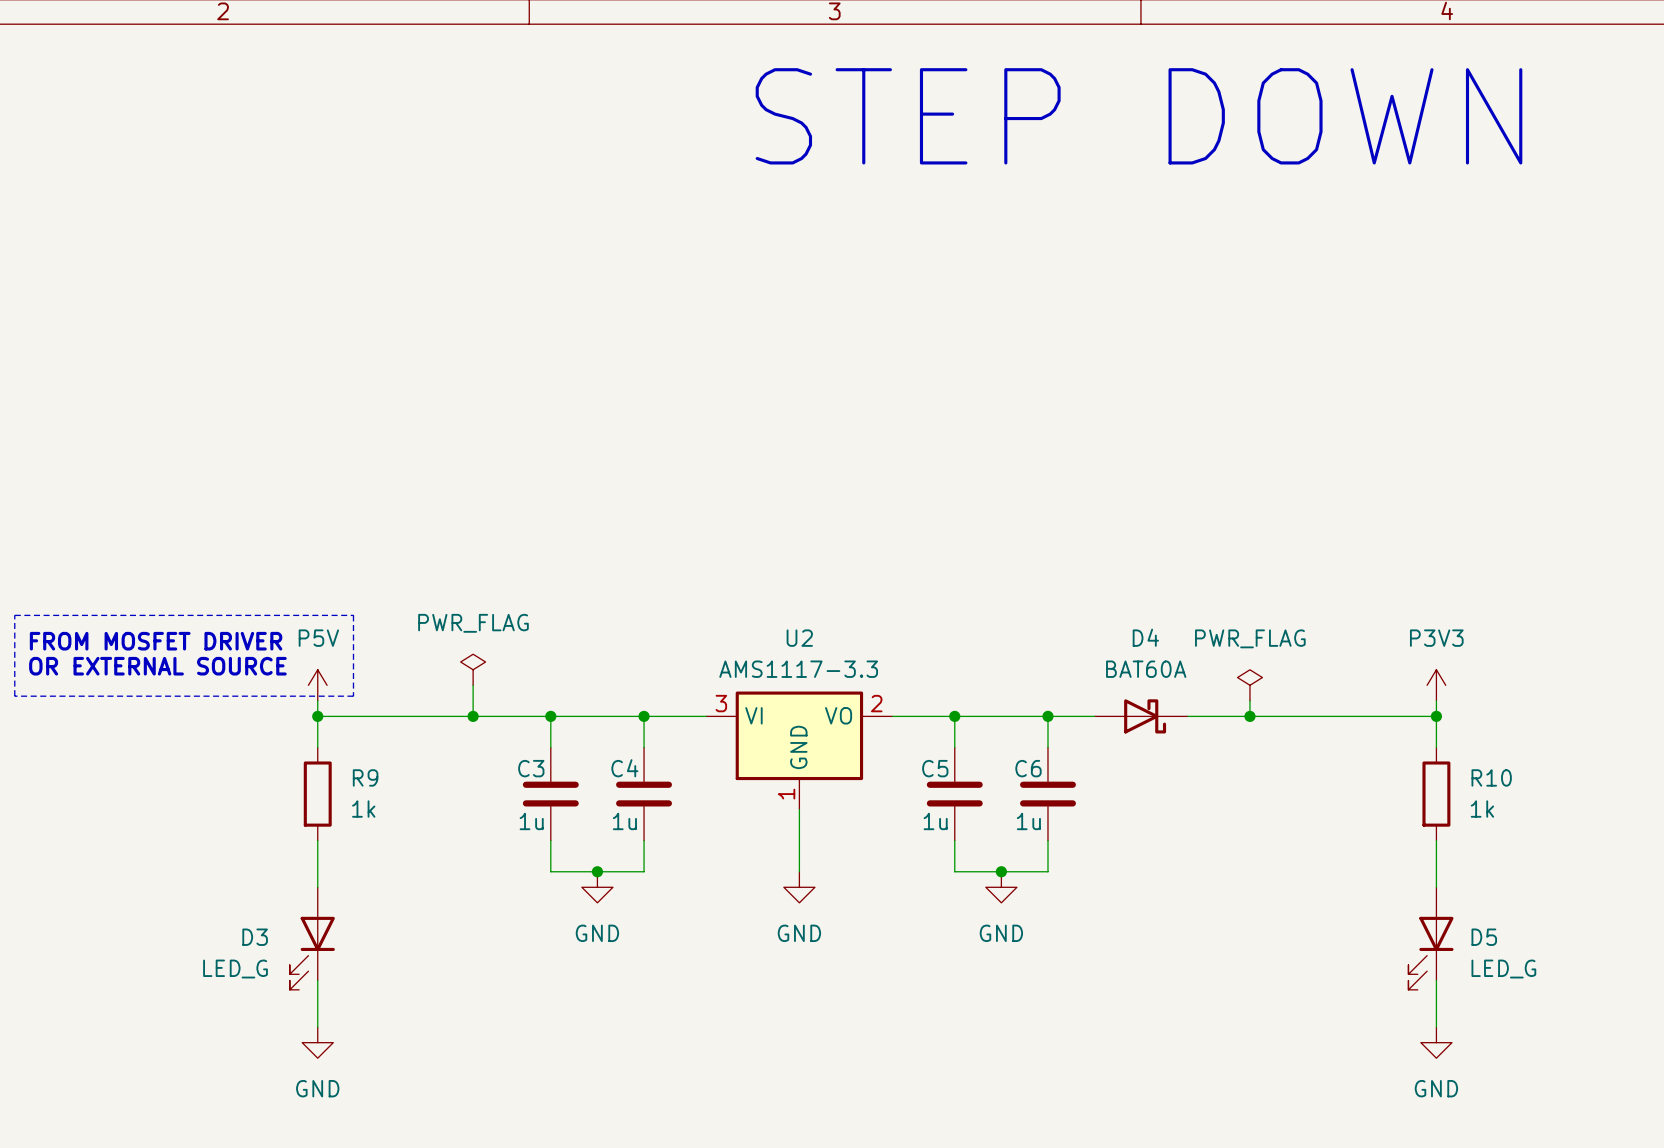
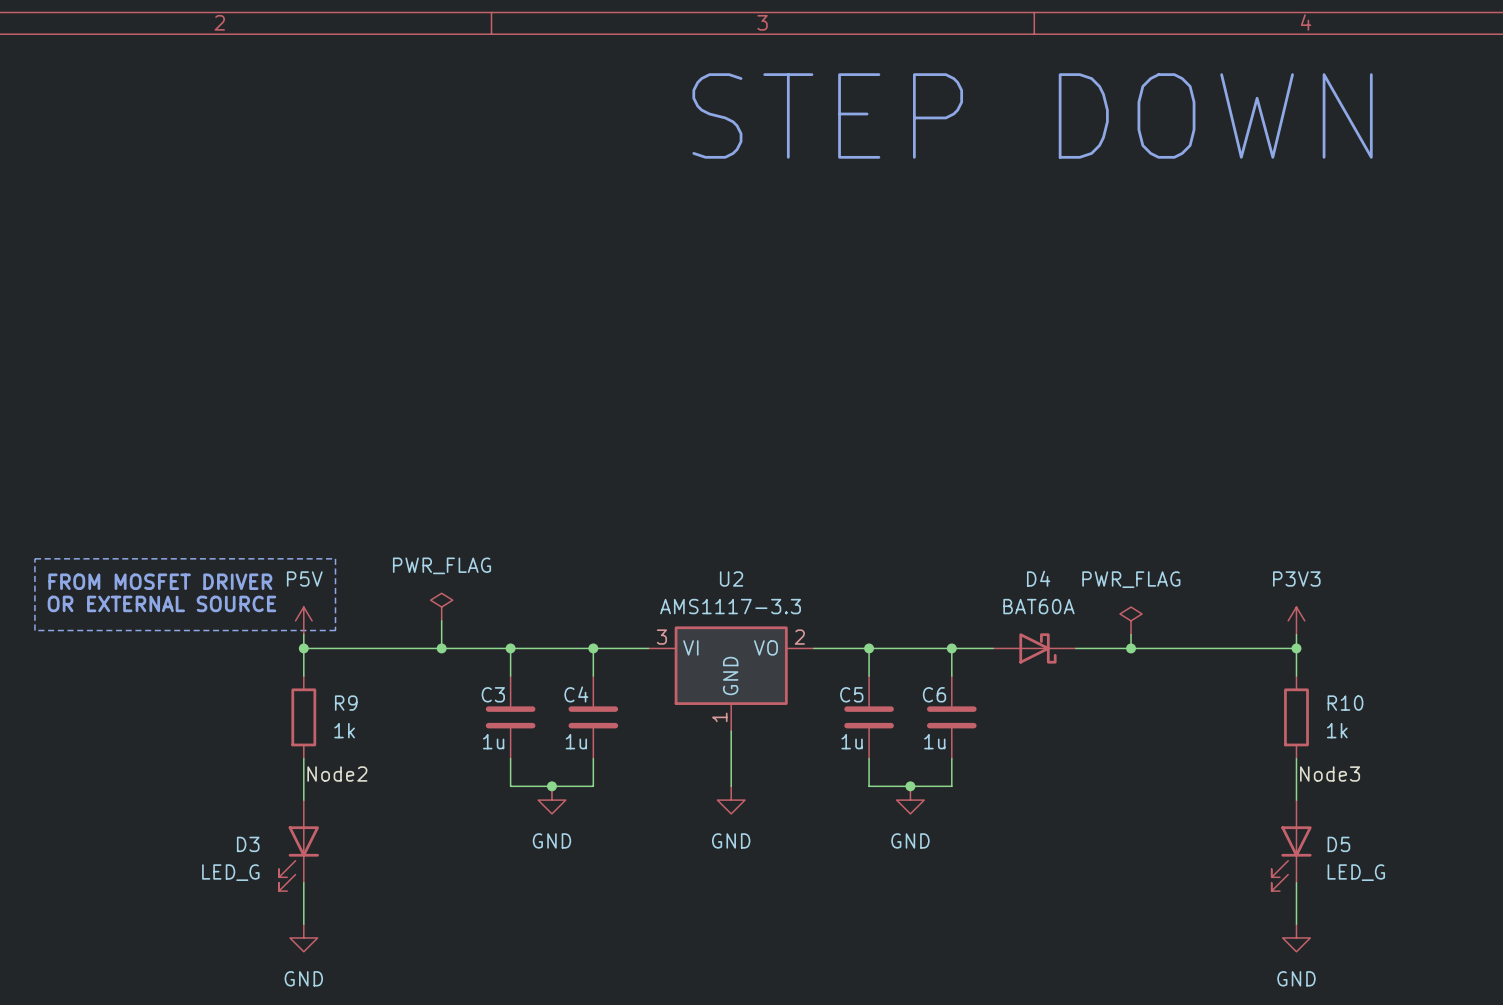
label: none -> Node2 (337, 774)
label: none -> Node3 (1330, 774)

